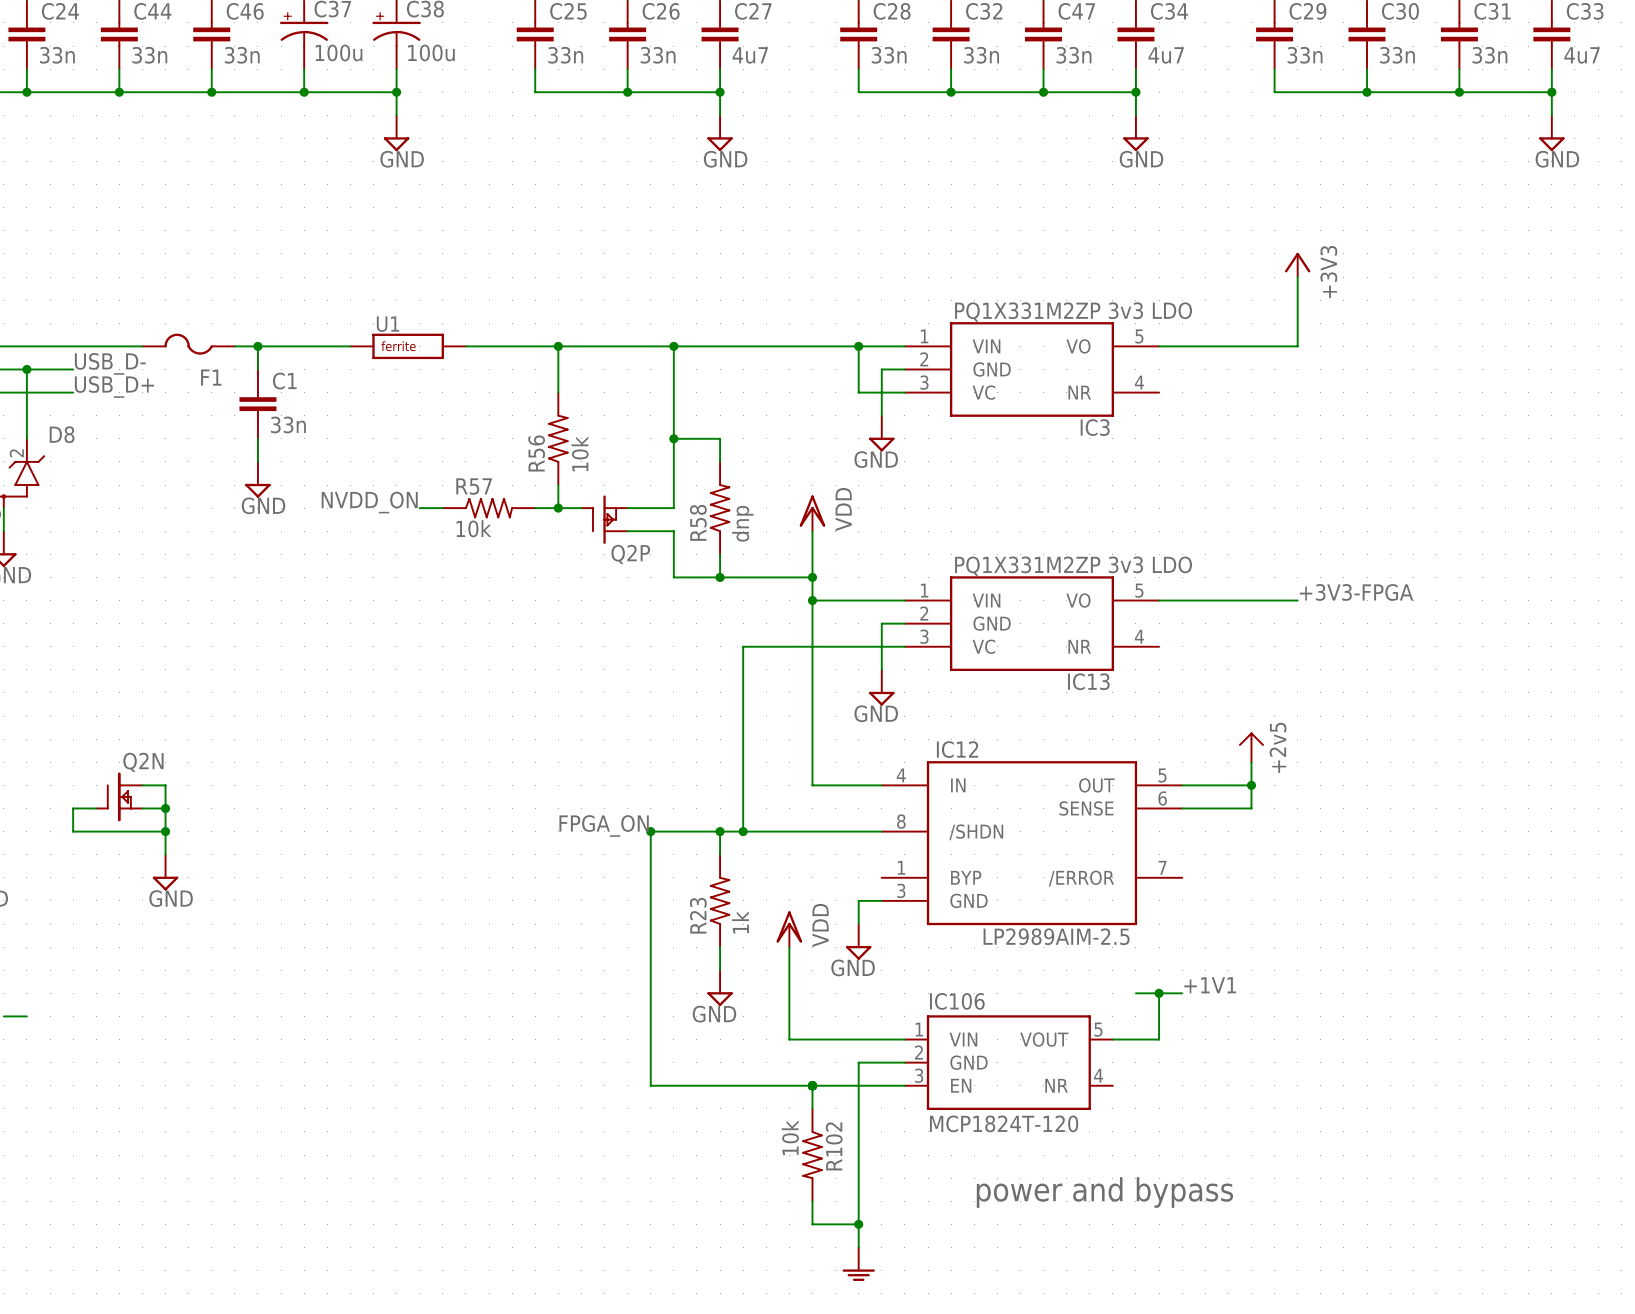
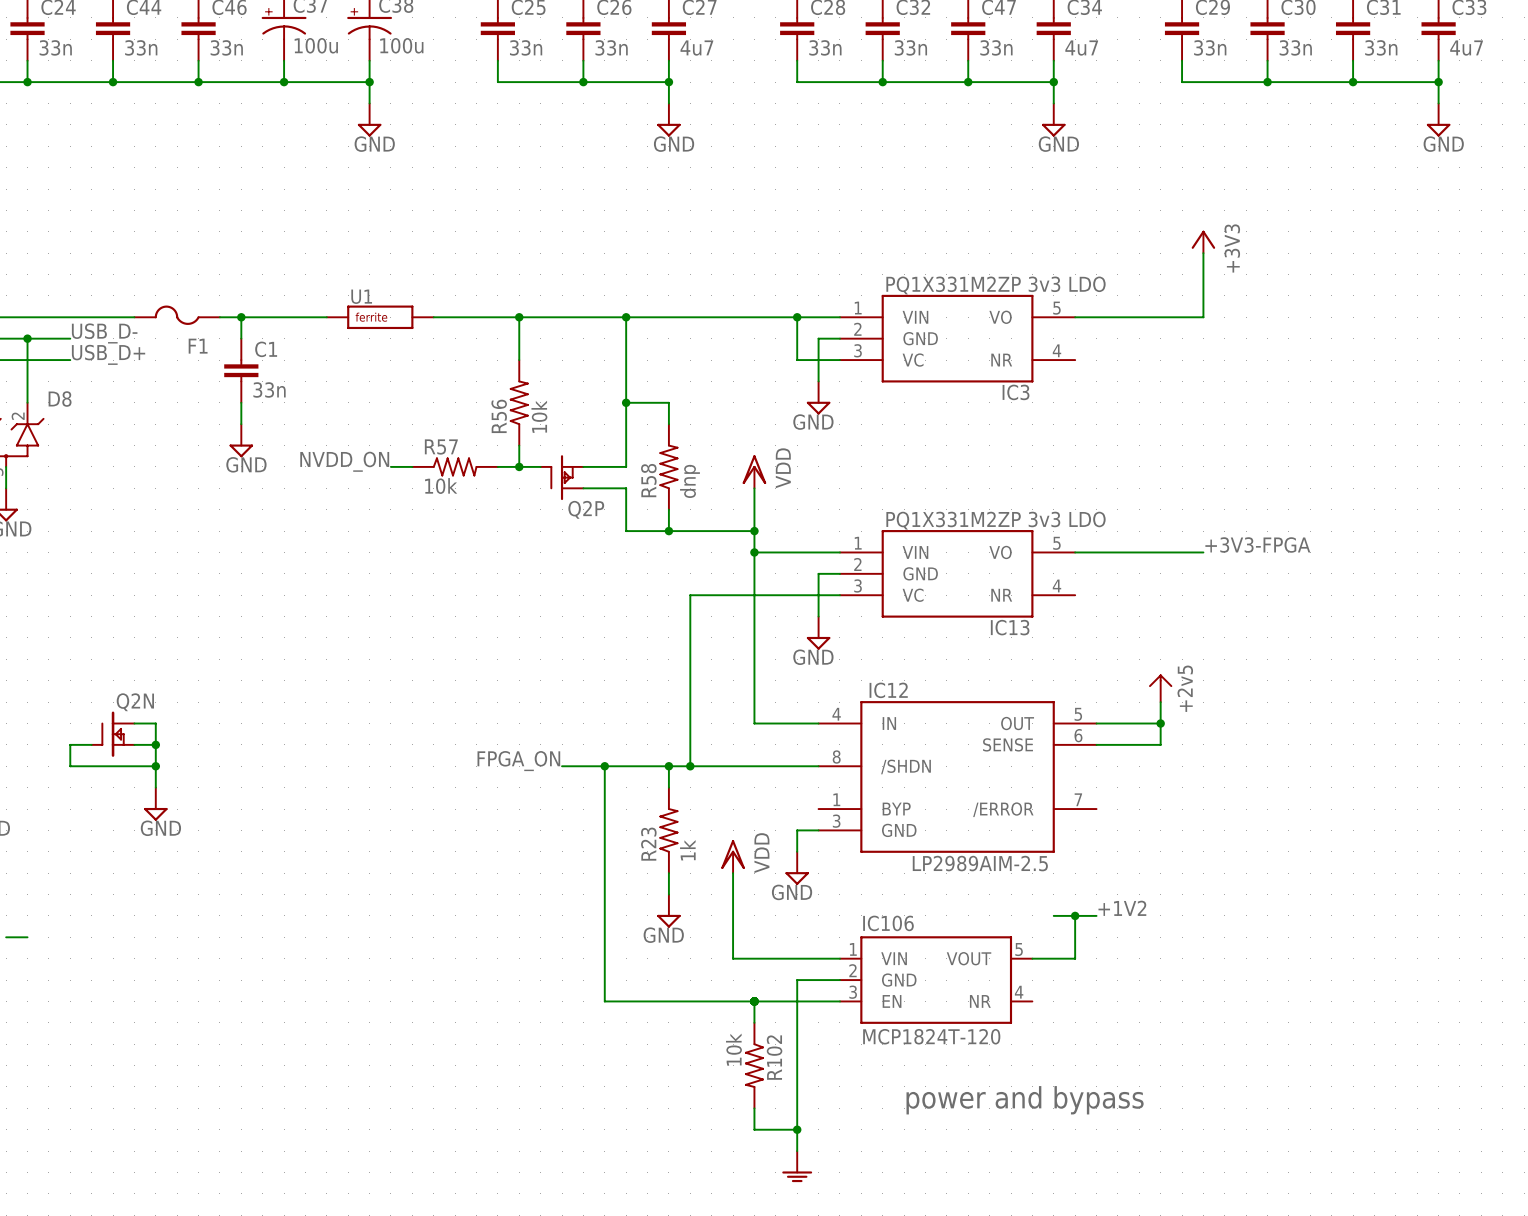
label position: FPGA_ON (604, 825) -> FPGA_ON (518, 761)
wire: none -> (562, 766) (604, 766)
label: +1V1 (1210, 985) -> +1V2 (1122, 908)

